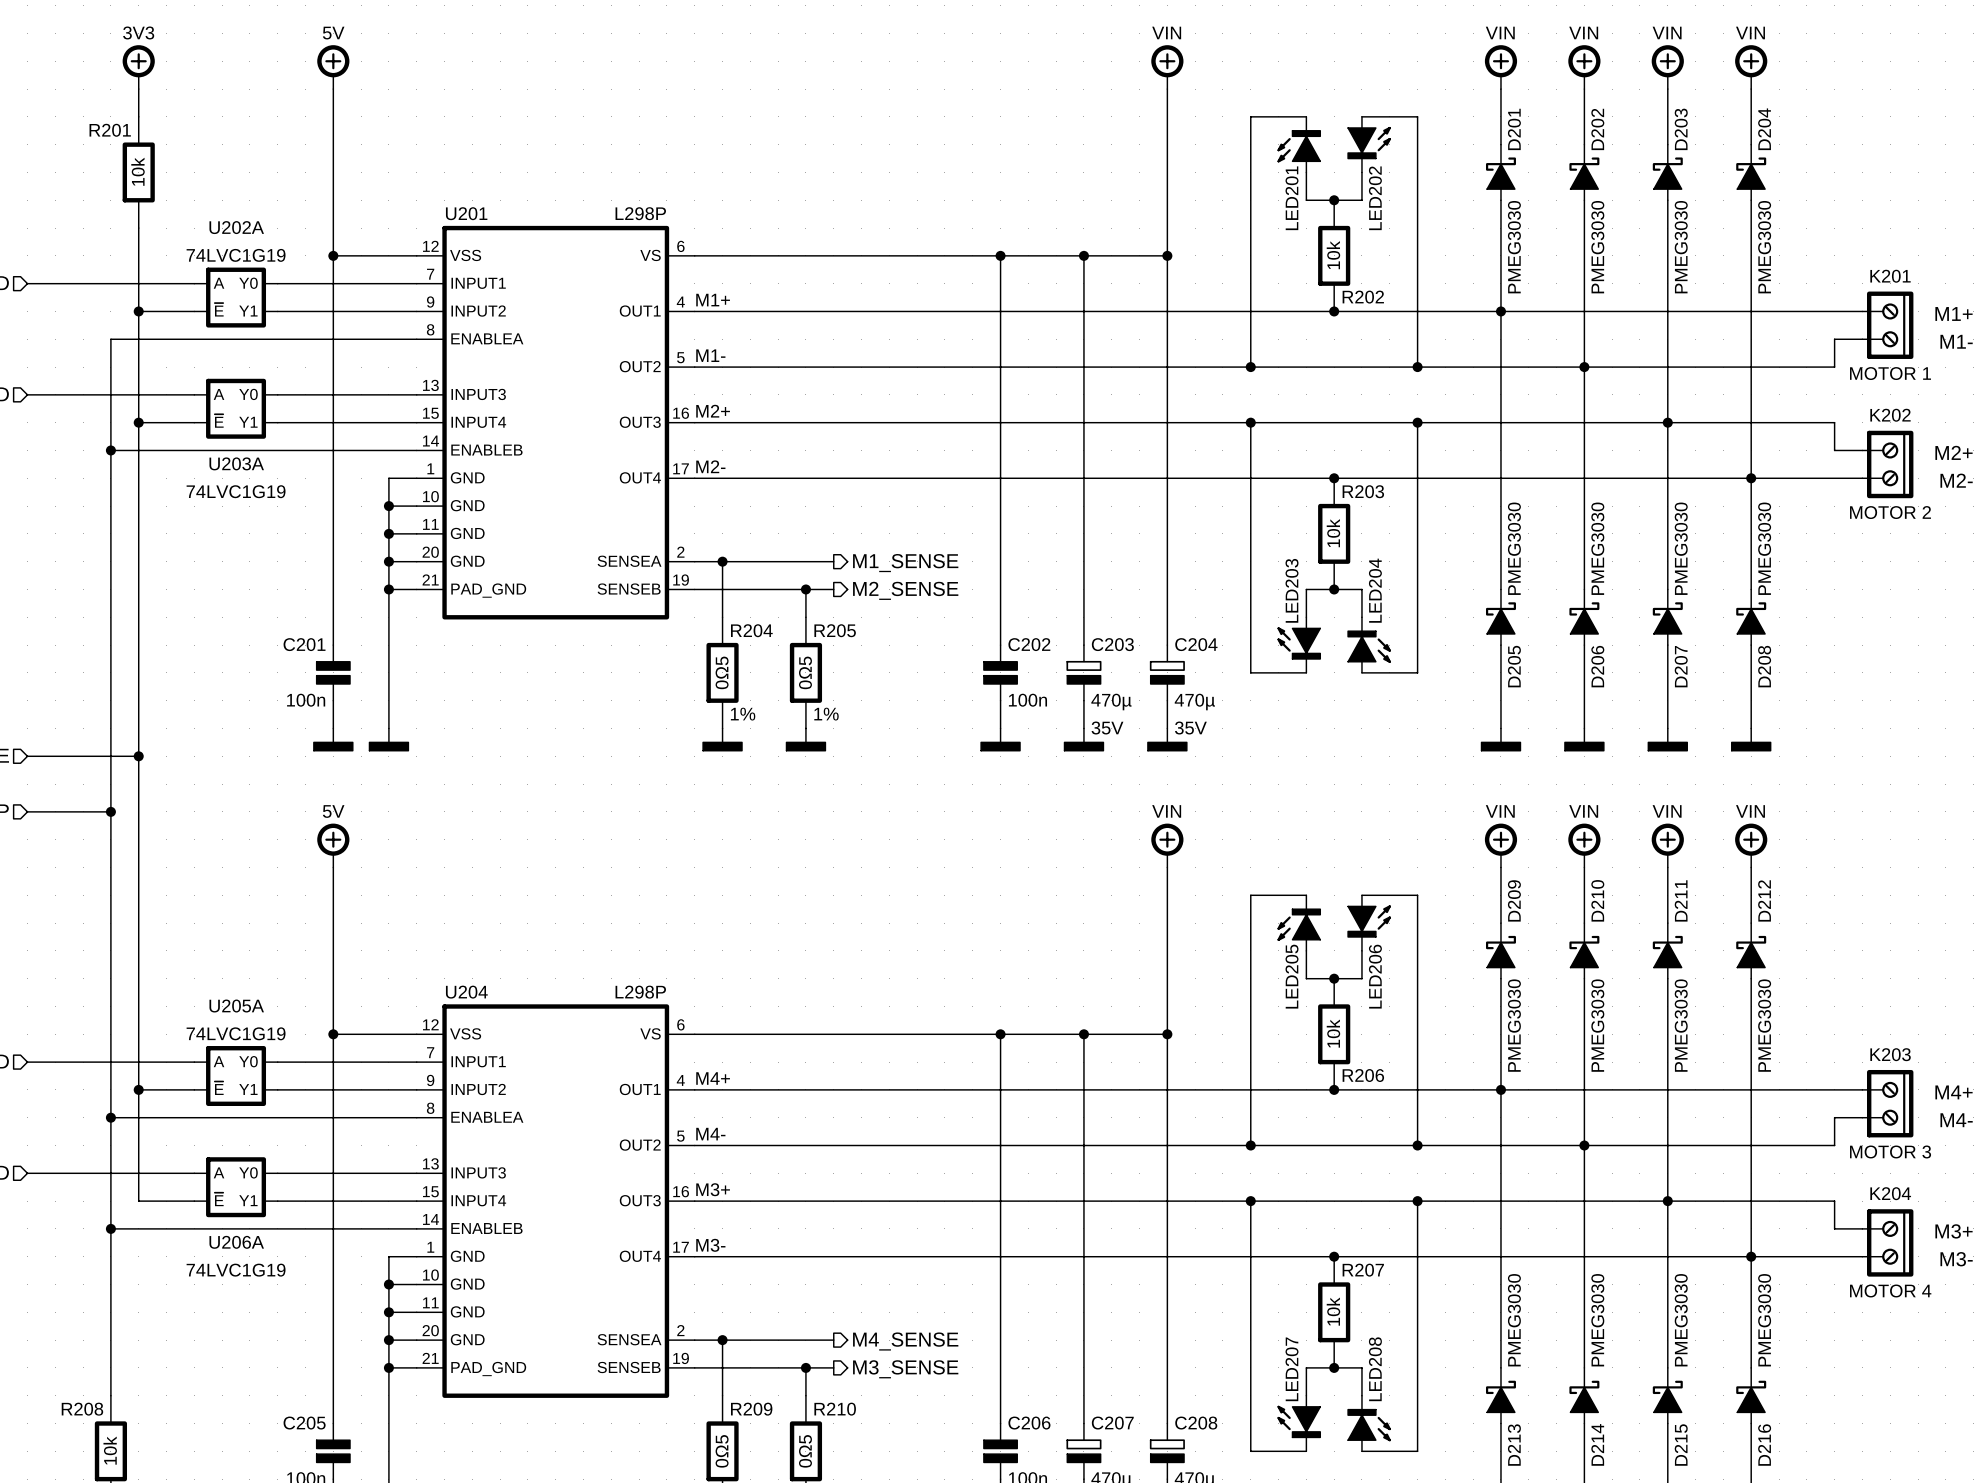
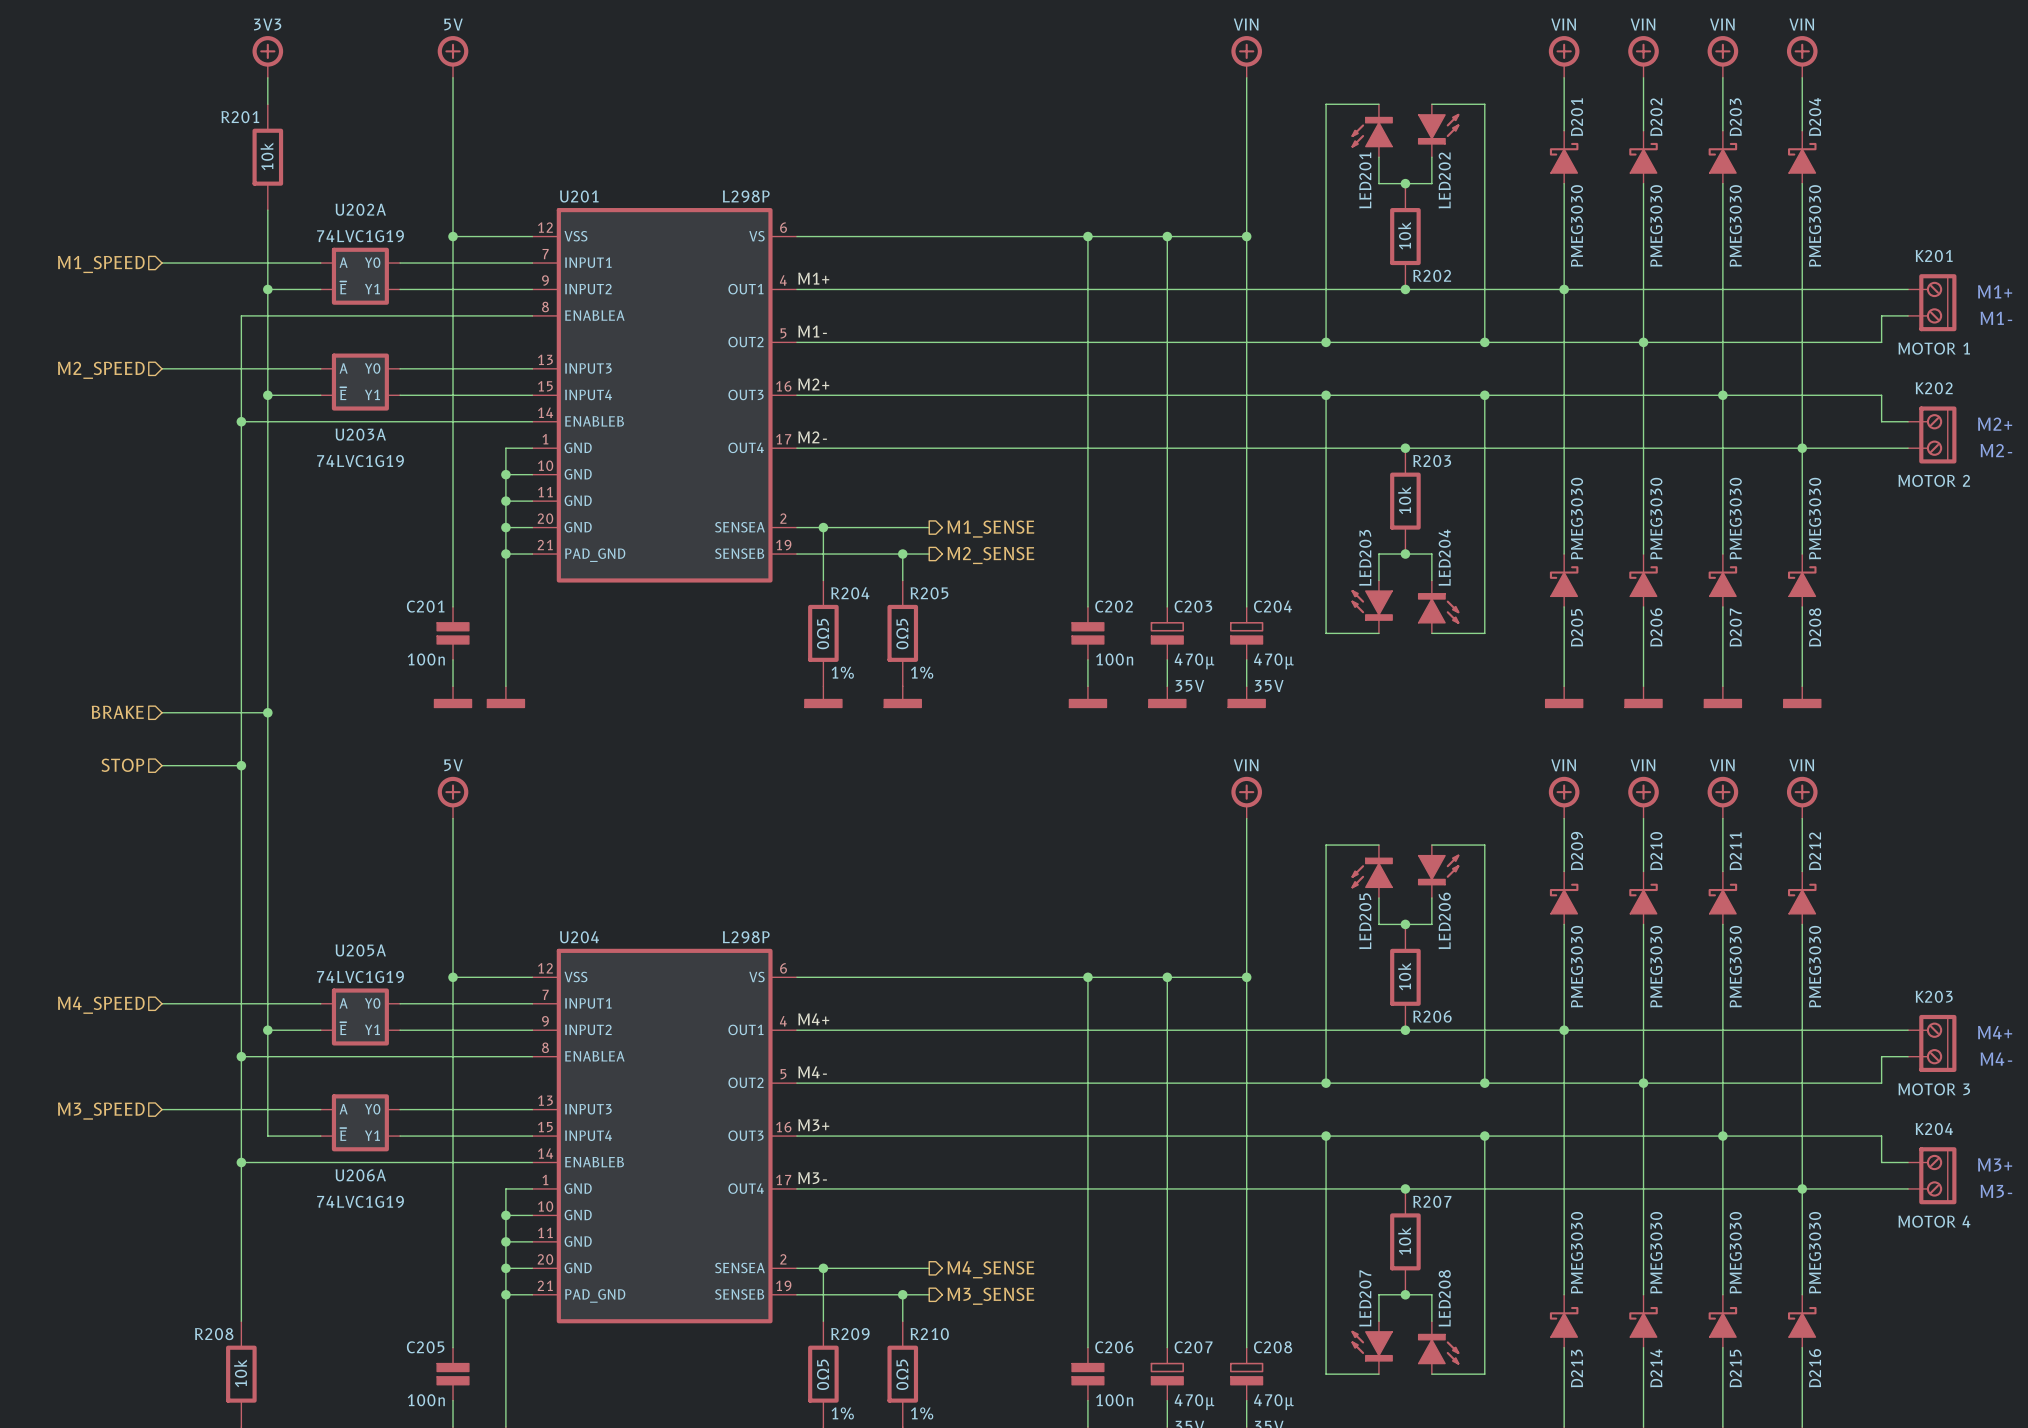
K201 symbol: [1862, 291, 1914, 359] -> [1908, 274, 1957, 332]
K202 symbol: [1862, 430, 1914, 499] -> [1908, 406, 1957, 464]
K203 symbol: [1862, 1069, 1914, 1138] -> [1908, 1014, 1957, 1072]
K204 symbol: [1862, 1209, 1914, 1277] -> [1908, 1147, 1957, 1205]

